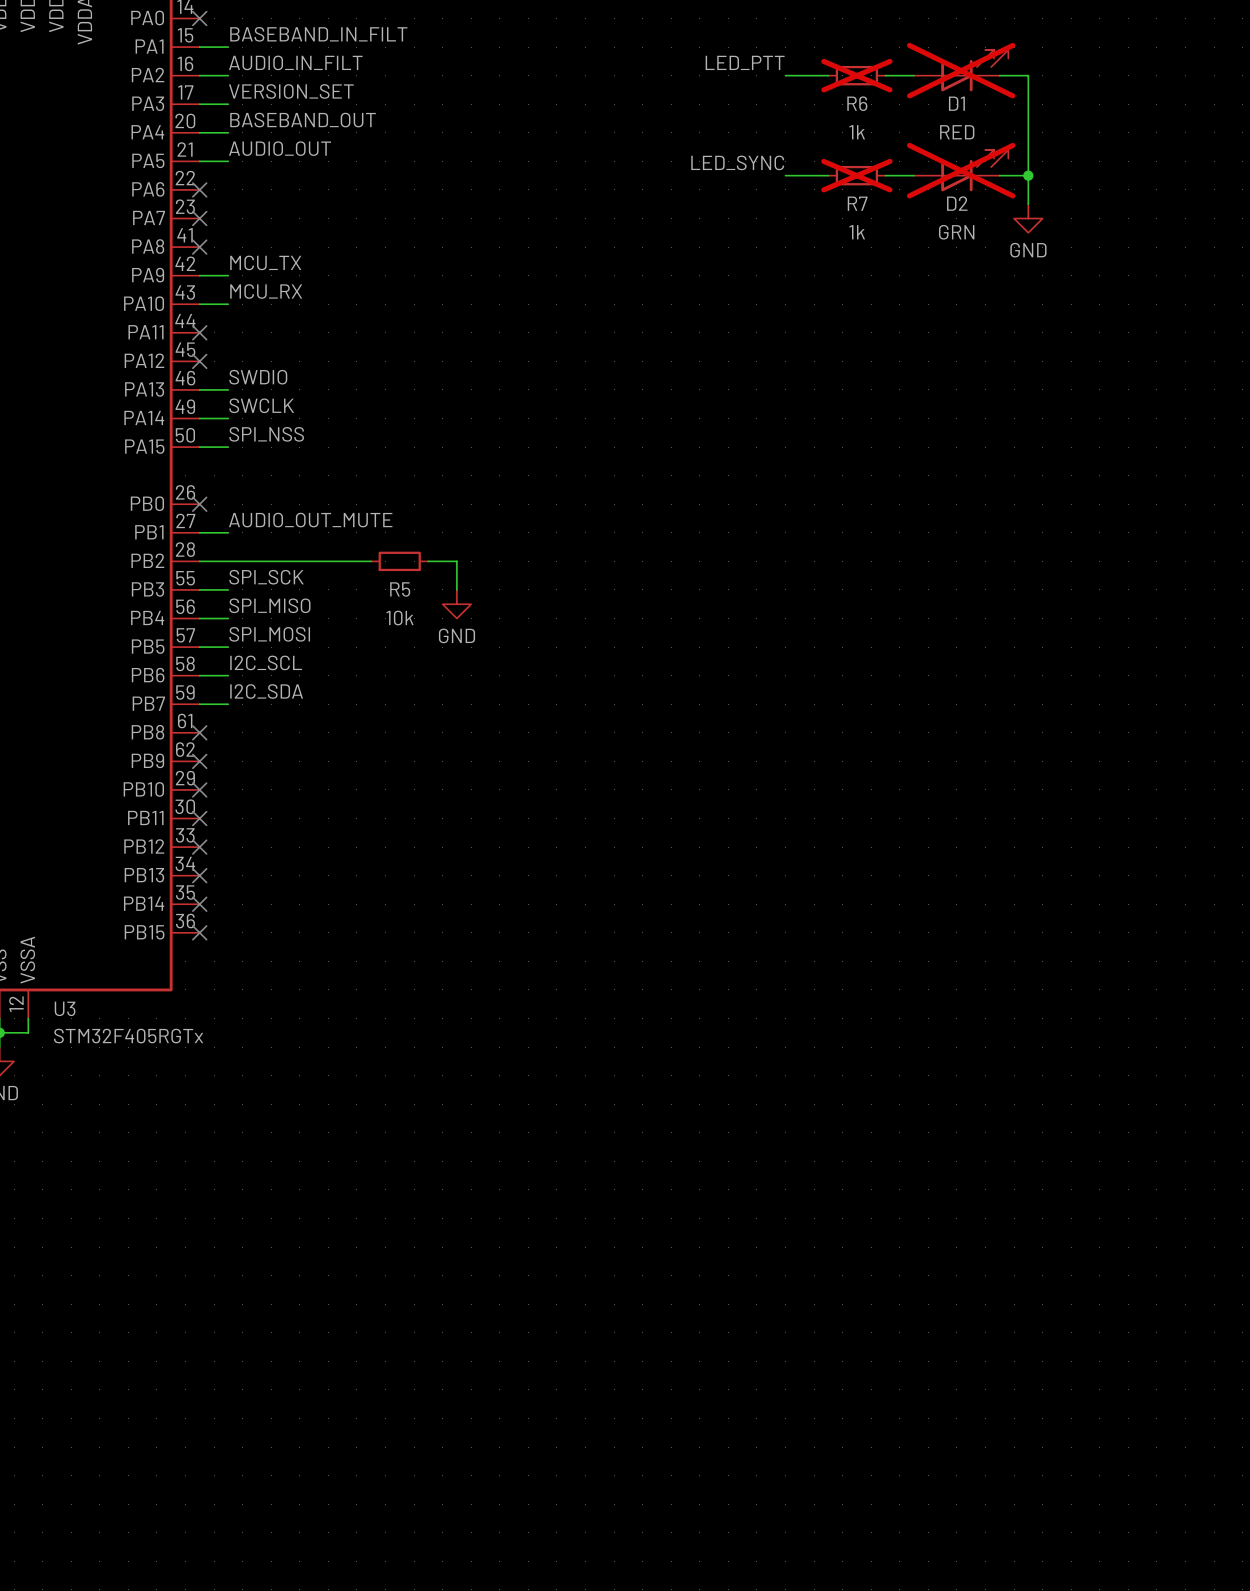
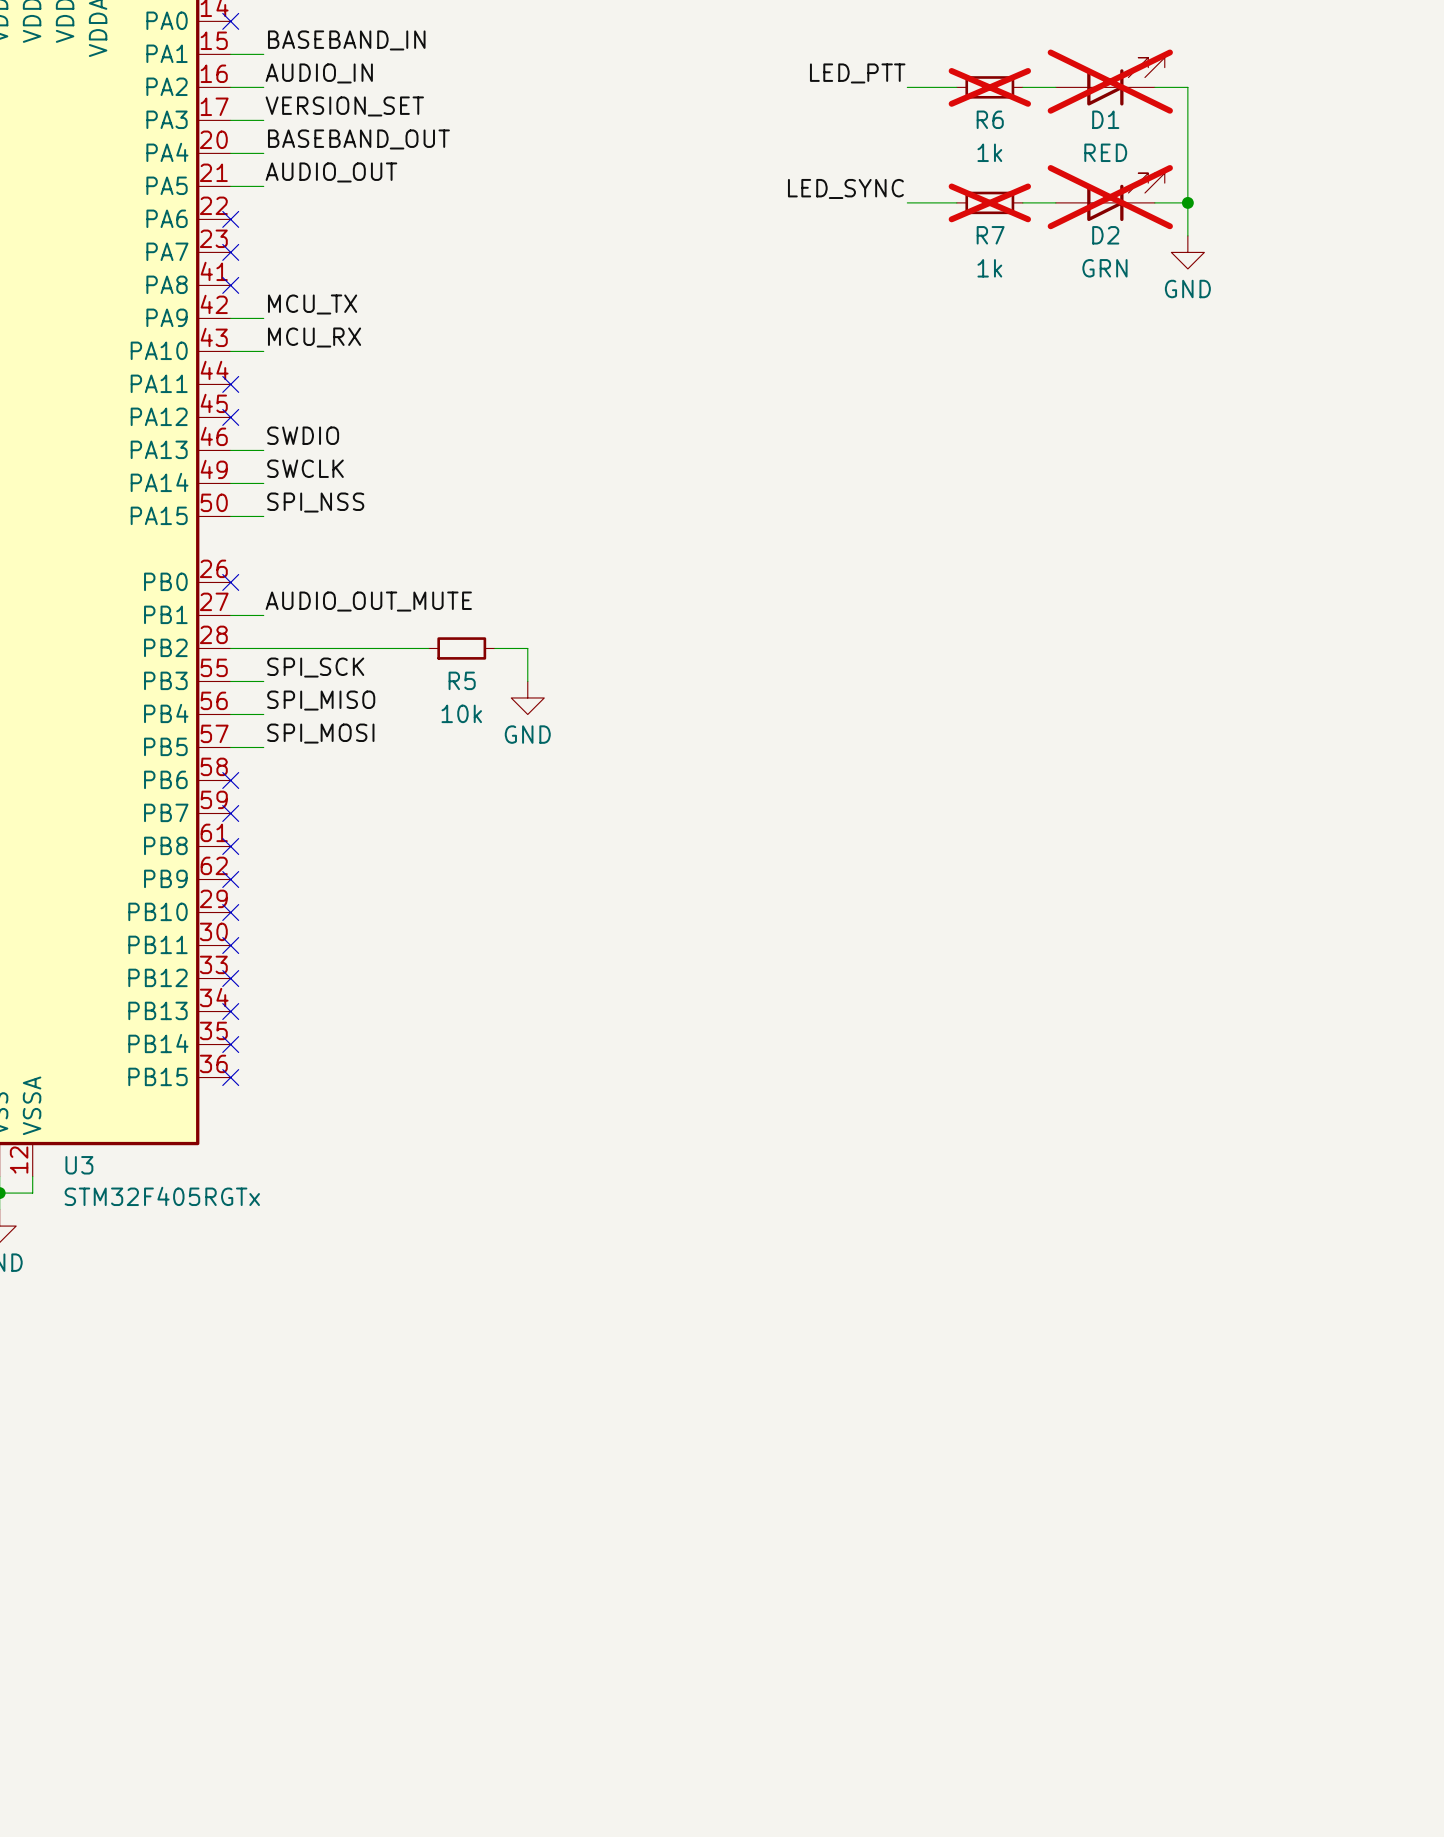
label: BASEBAND_IN_FILT (318, 34) -> BASEBAND_IN (346, 40)
label: AUDIO_IN_FILT (295, 62) -> AUDIO_IN (319, 73)
label: I2C_SCL (266, 662) -> none
wire: (199, 675) (228, 675) -> none
no-connect mark: none -> (230, 780)
label: I2C_SDA (266, 691) -> none
wire: (199, 704) (228, 704) -> none
no-connect mark: none -> (230, 813)

